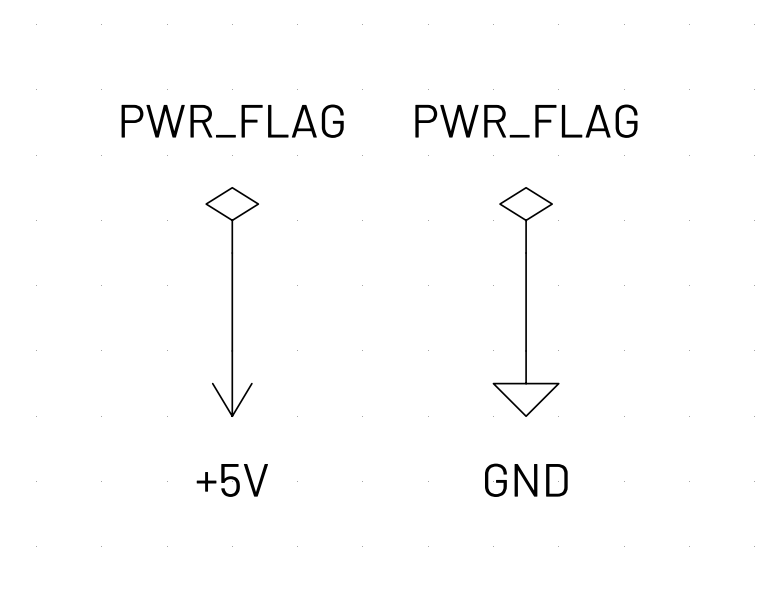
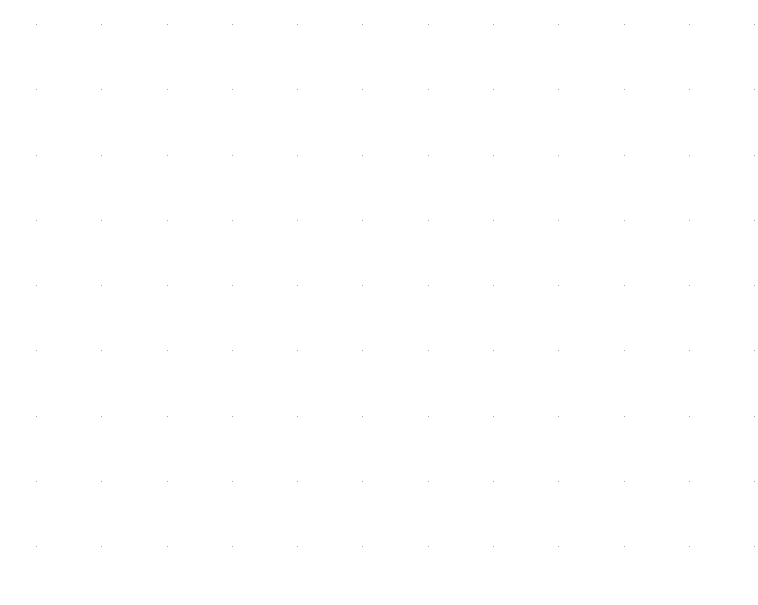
power symbol: PWR_FLAG (232, 220) -> none
power symbol: PWR_FLAG (526, 220) -> none
wire: (232, 253) (232, 350) -> none
wire: (526, 253) (526, 350) -> none
power symbol: +5V (232, 383) -> none
power symbol: GND (526, 383) -> none

